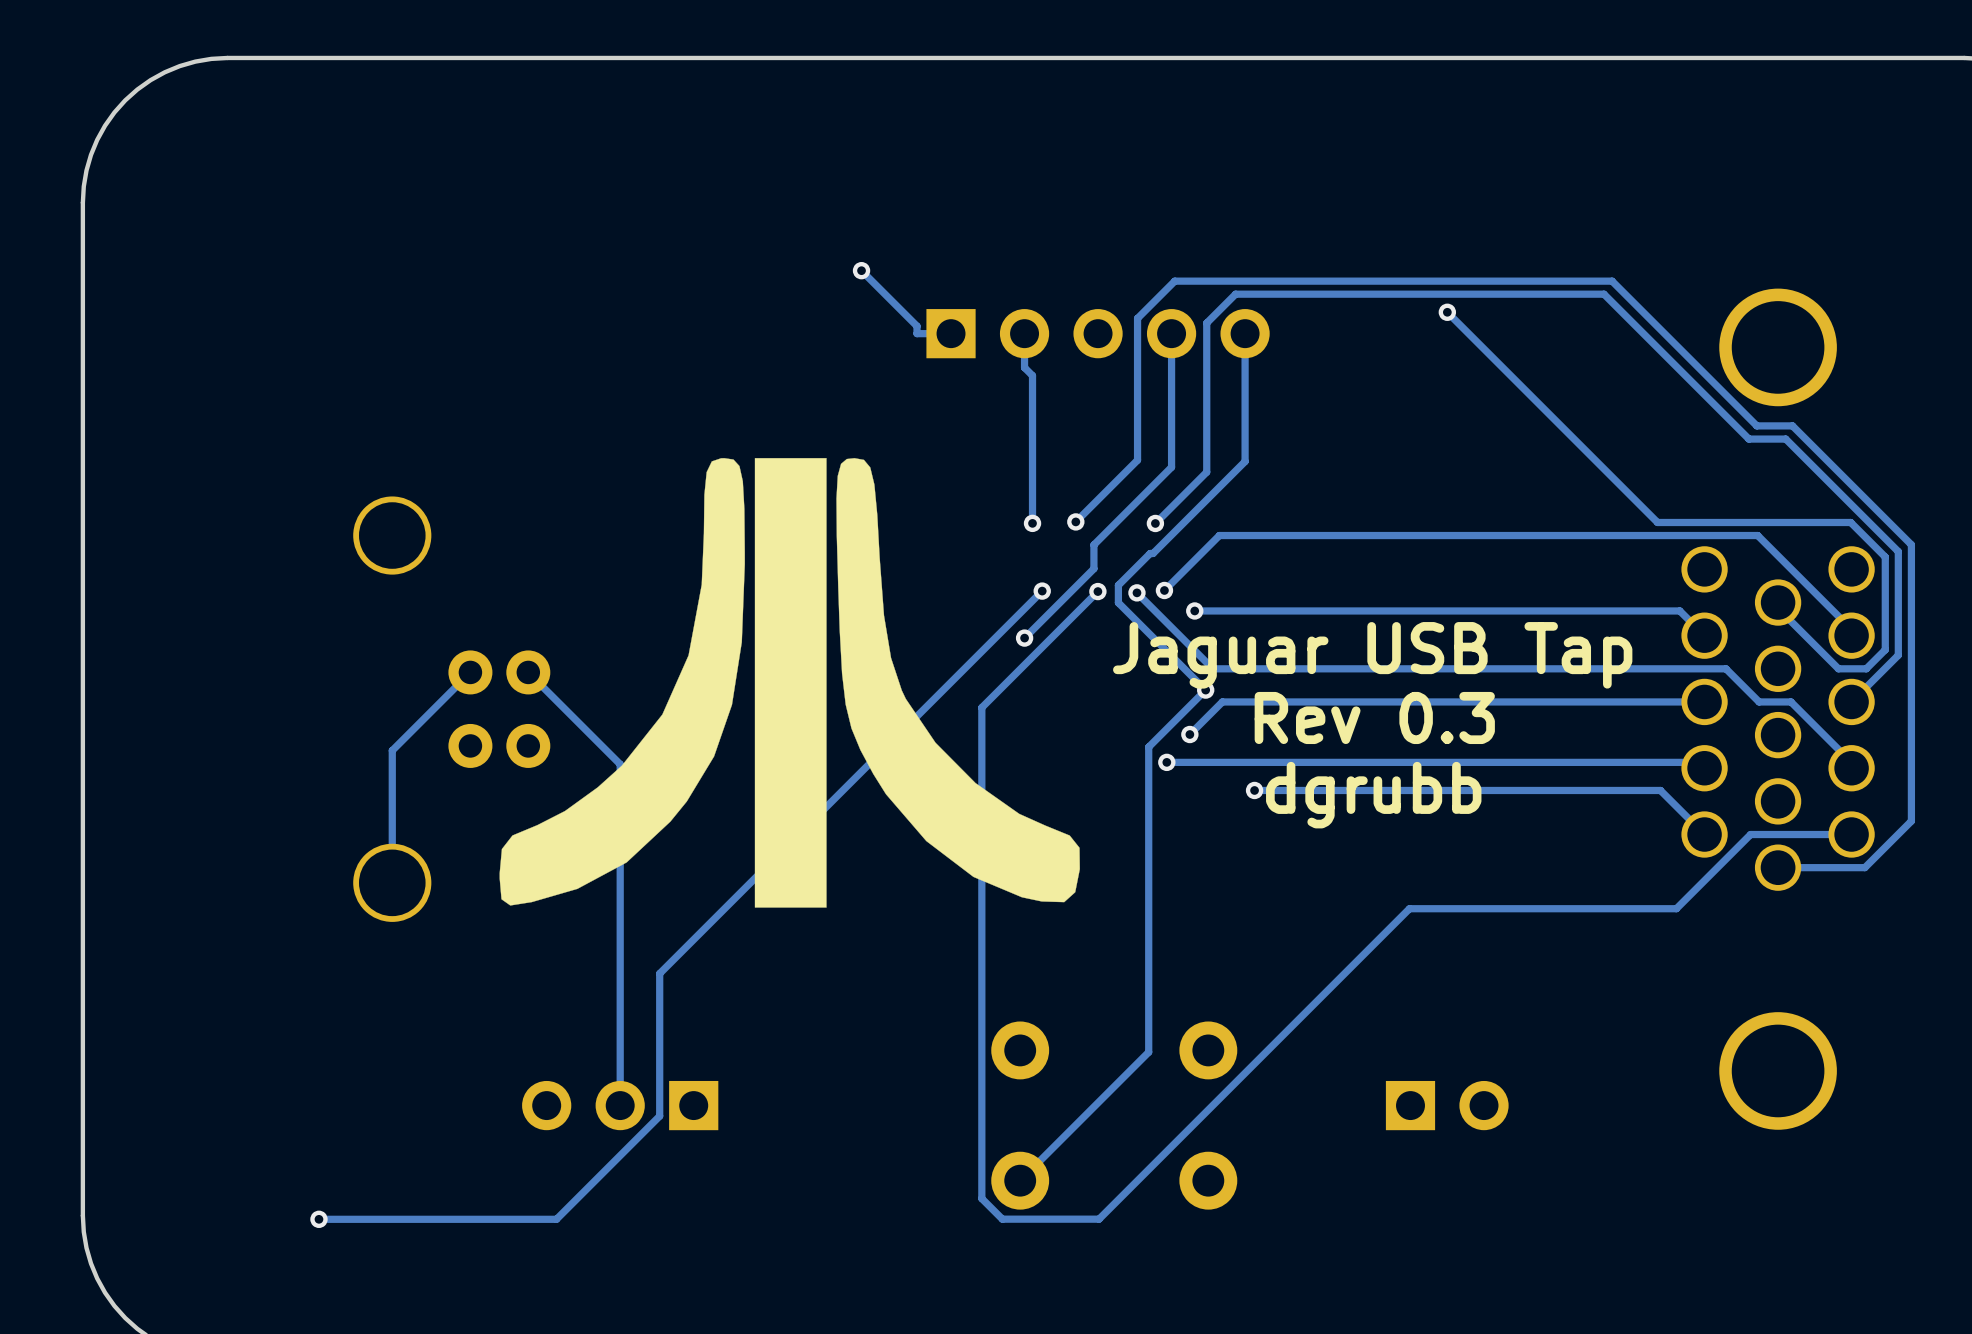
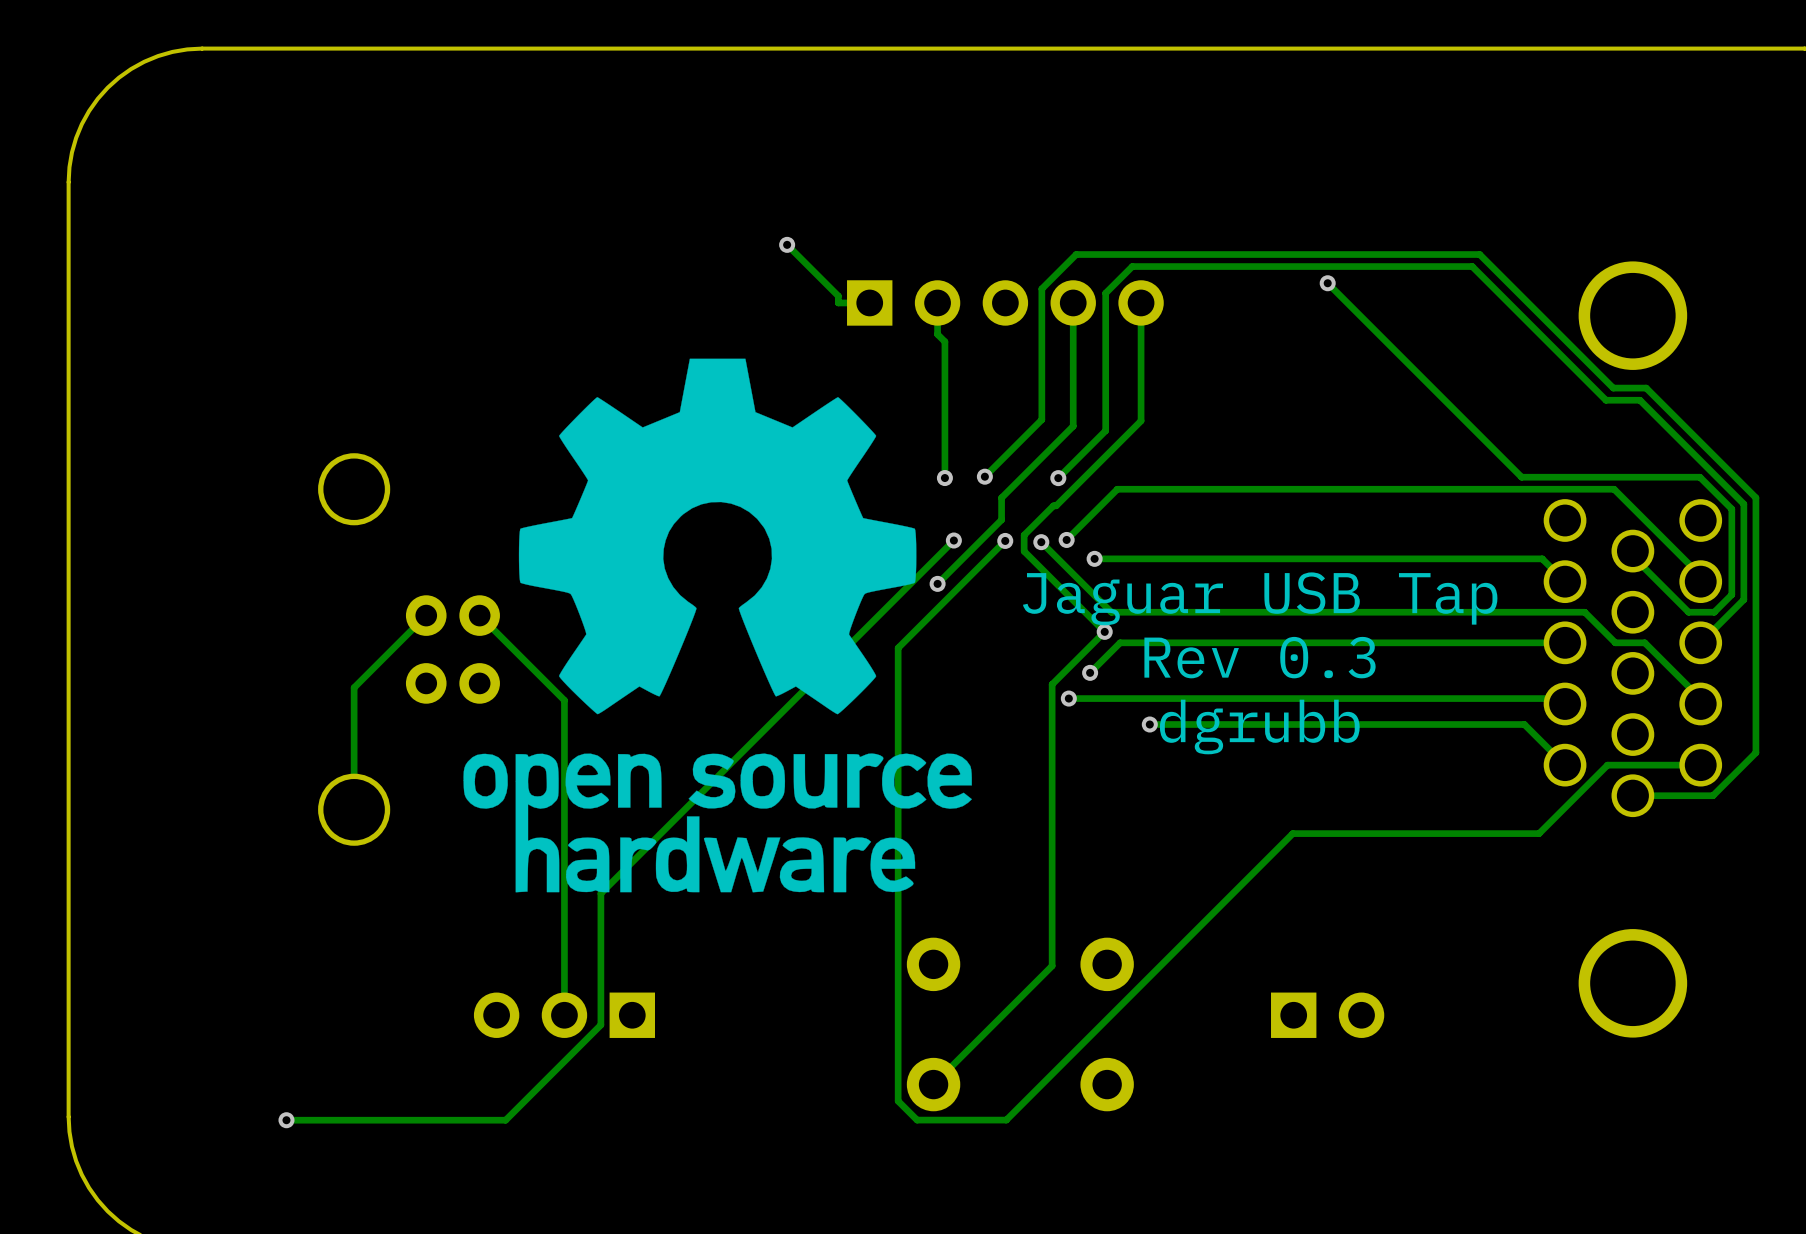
drawing shape: [499, 458, 1080, 908] -> [463, 358, 972, 893]

